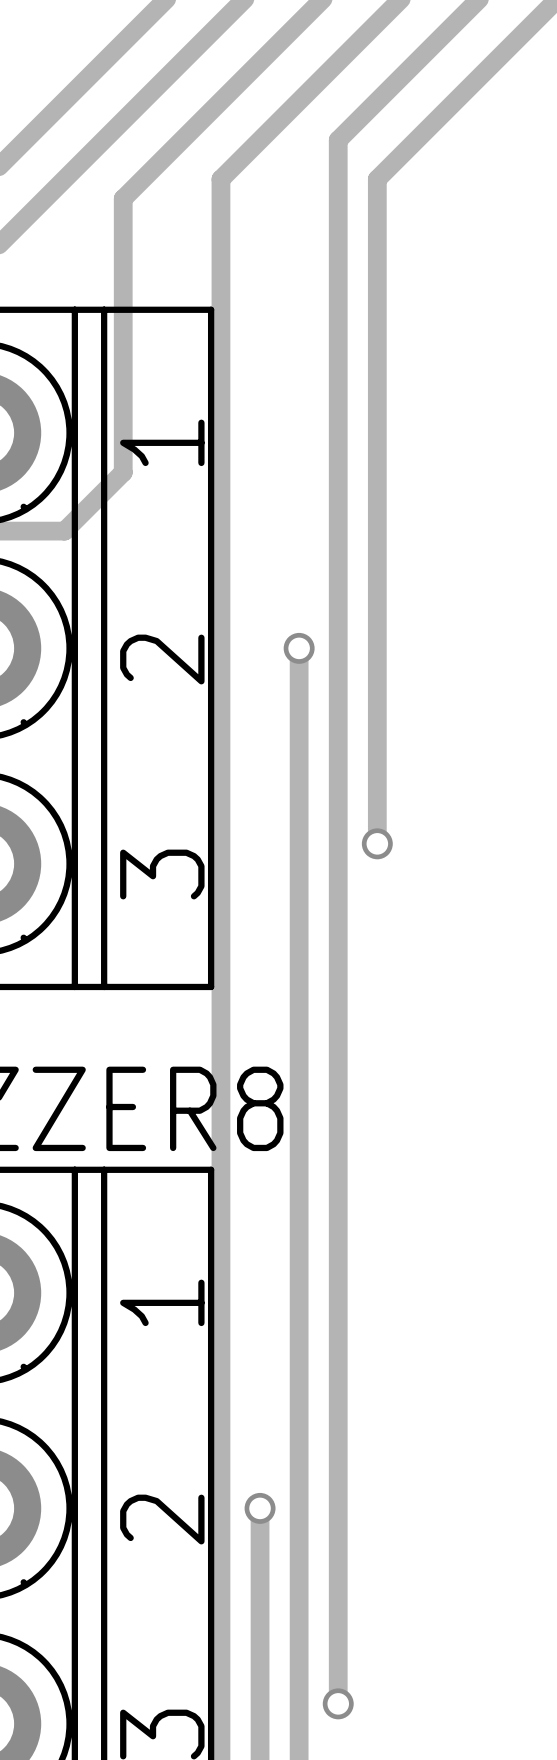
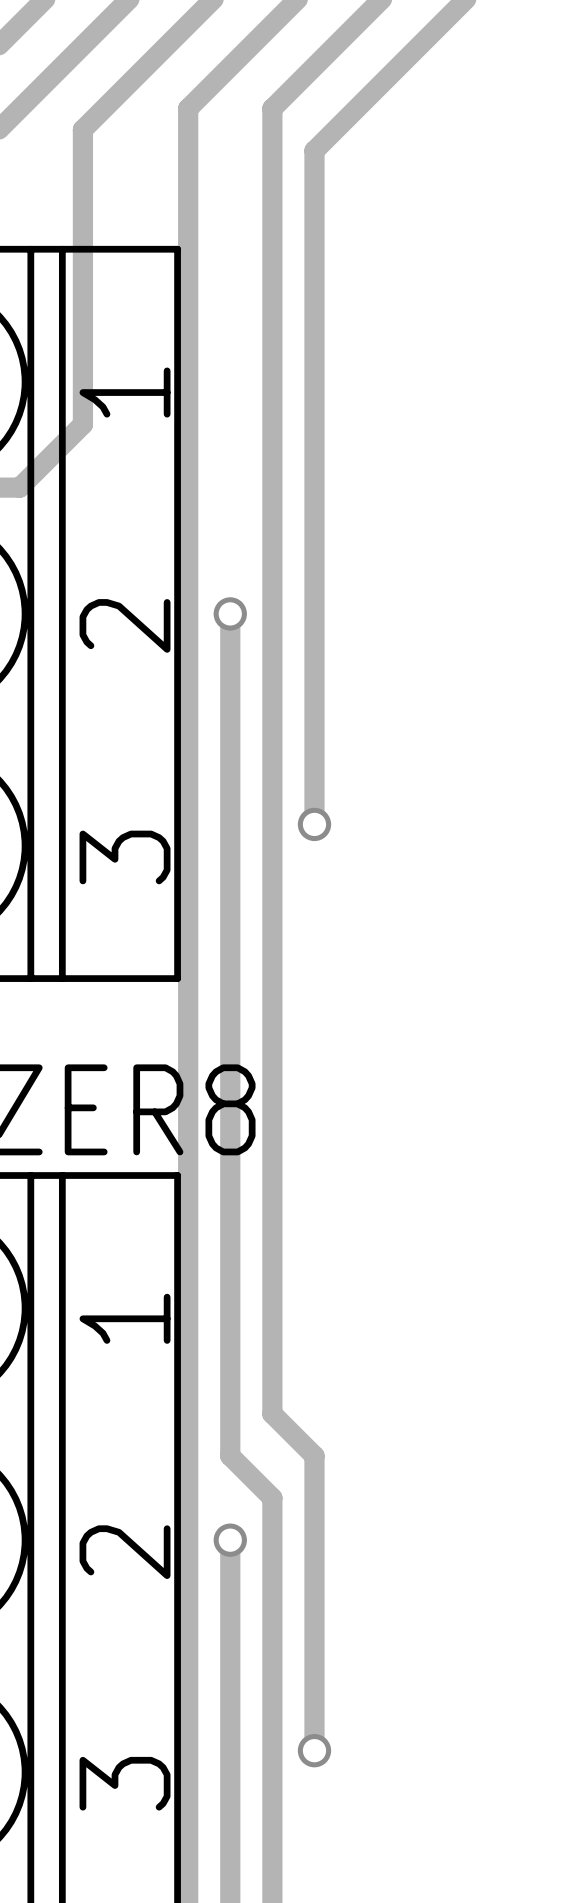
track: (338, 140) (338, 218) -> (356, 108) (314, 150)
track: none -> (314, 66) (272, 108) (272, 613)
track: (377, 179) (377, 843) -> none
track: none -> (230, 613) (230, 1455) (272, 1498)
via position: (299, 648) -> (230, 613)
track: (338, 843) (338, 1430) -> none
via position: (377, 843) -> (314, 824)
track: (299, 1391) (299, 1469) -> (272, 1413) (314, 1455)

